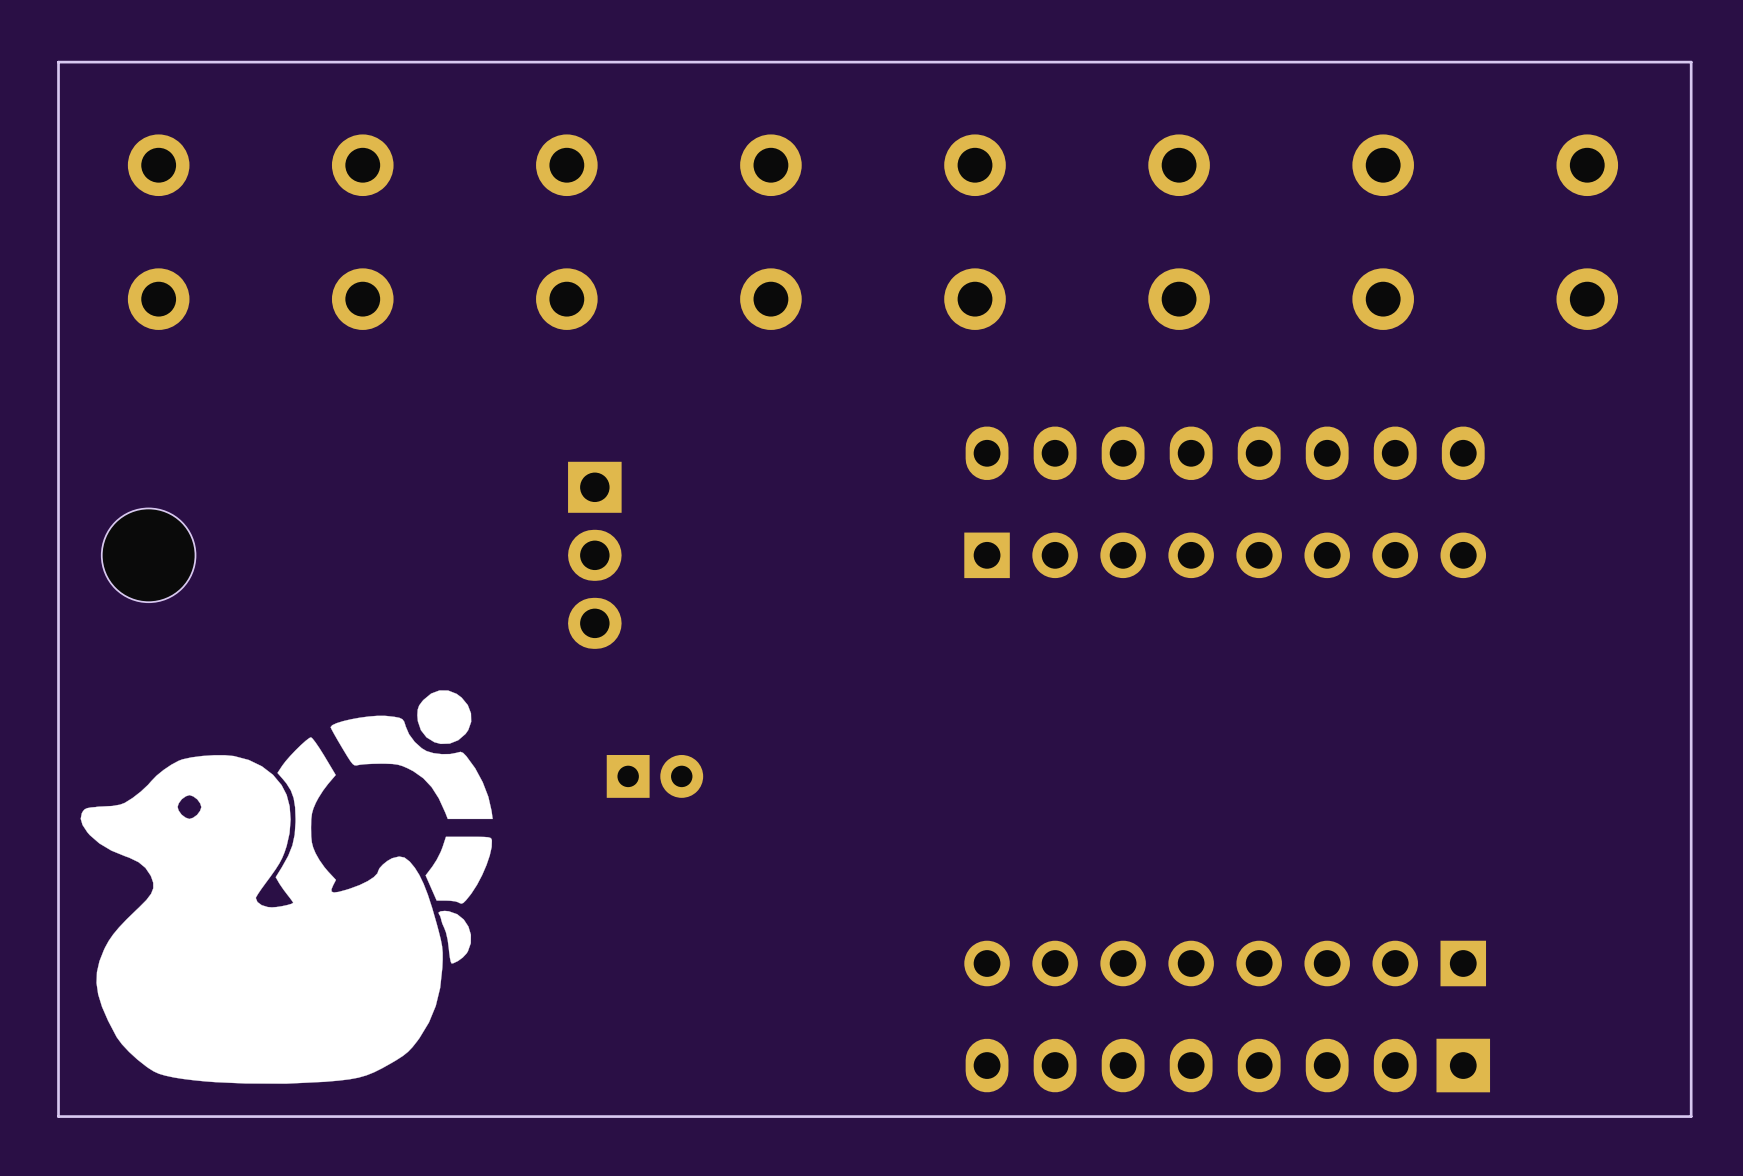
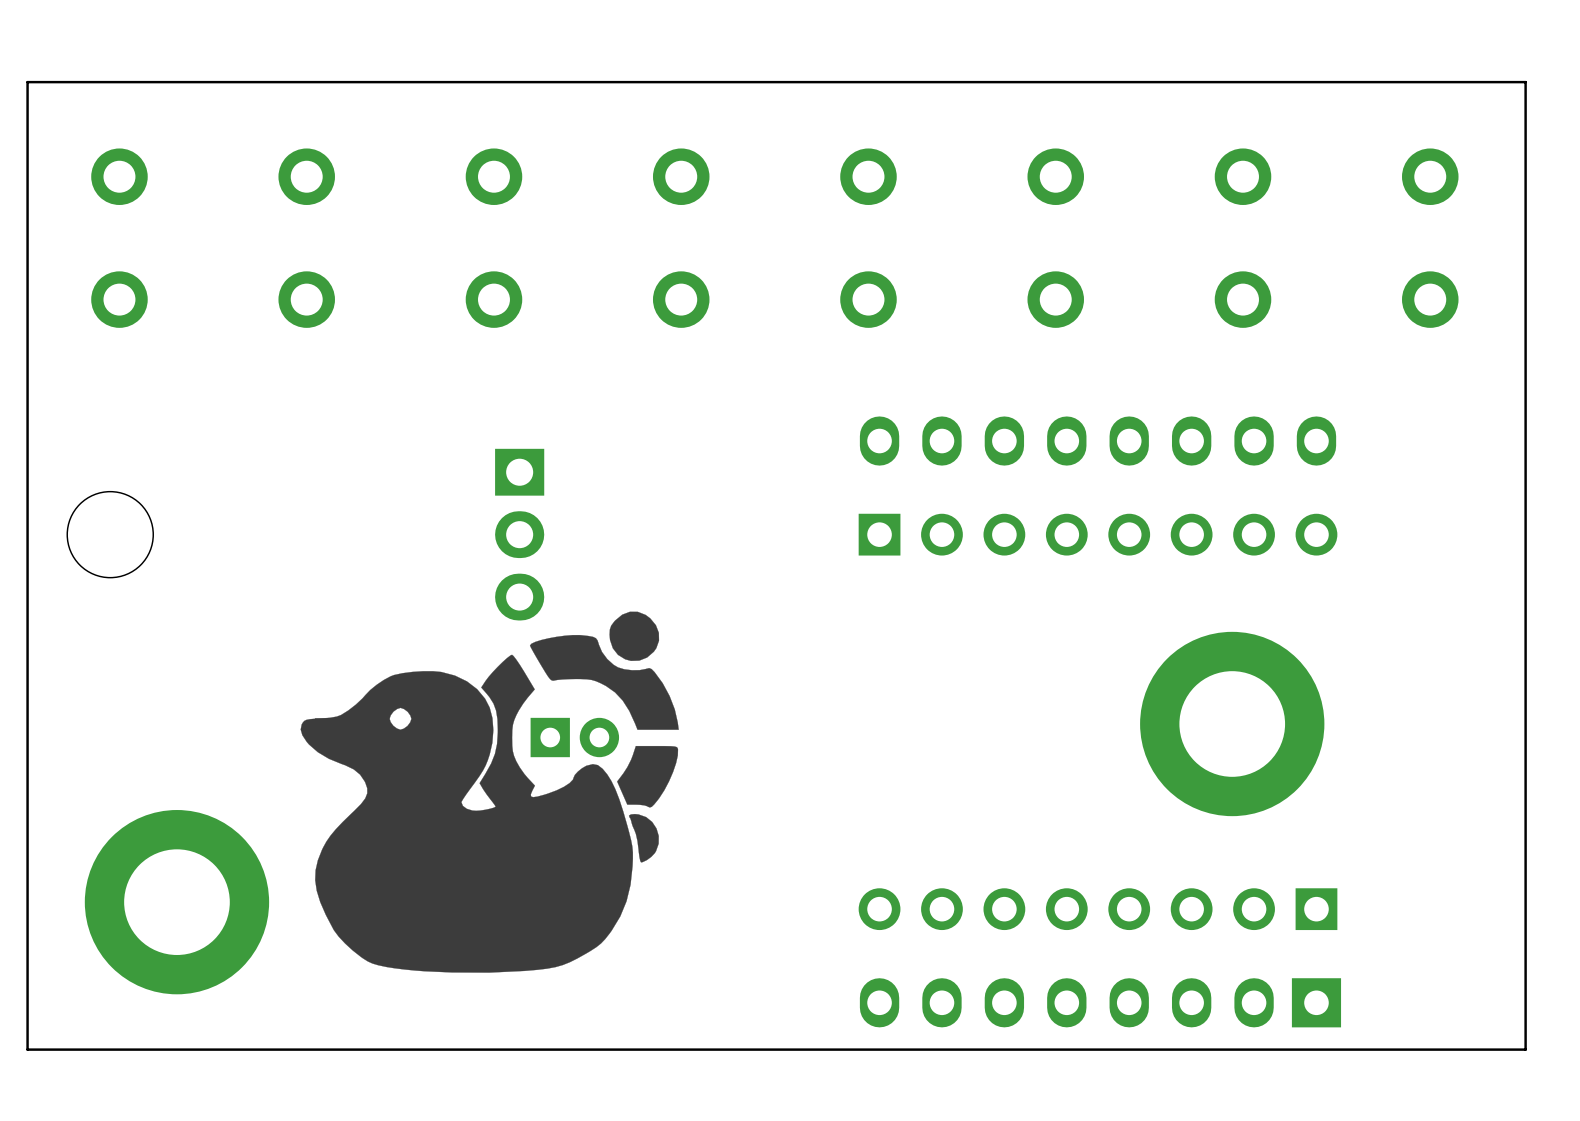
part: none -> (1232, 724)
drawing position: (286, 887) -> (489, 792)
part: none -> (176, 902)

